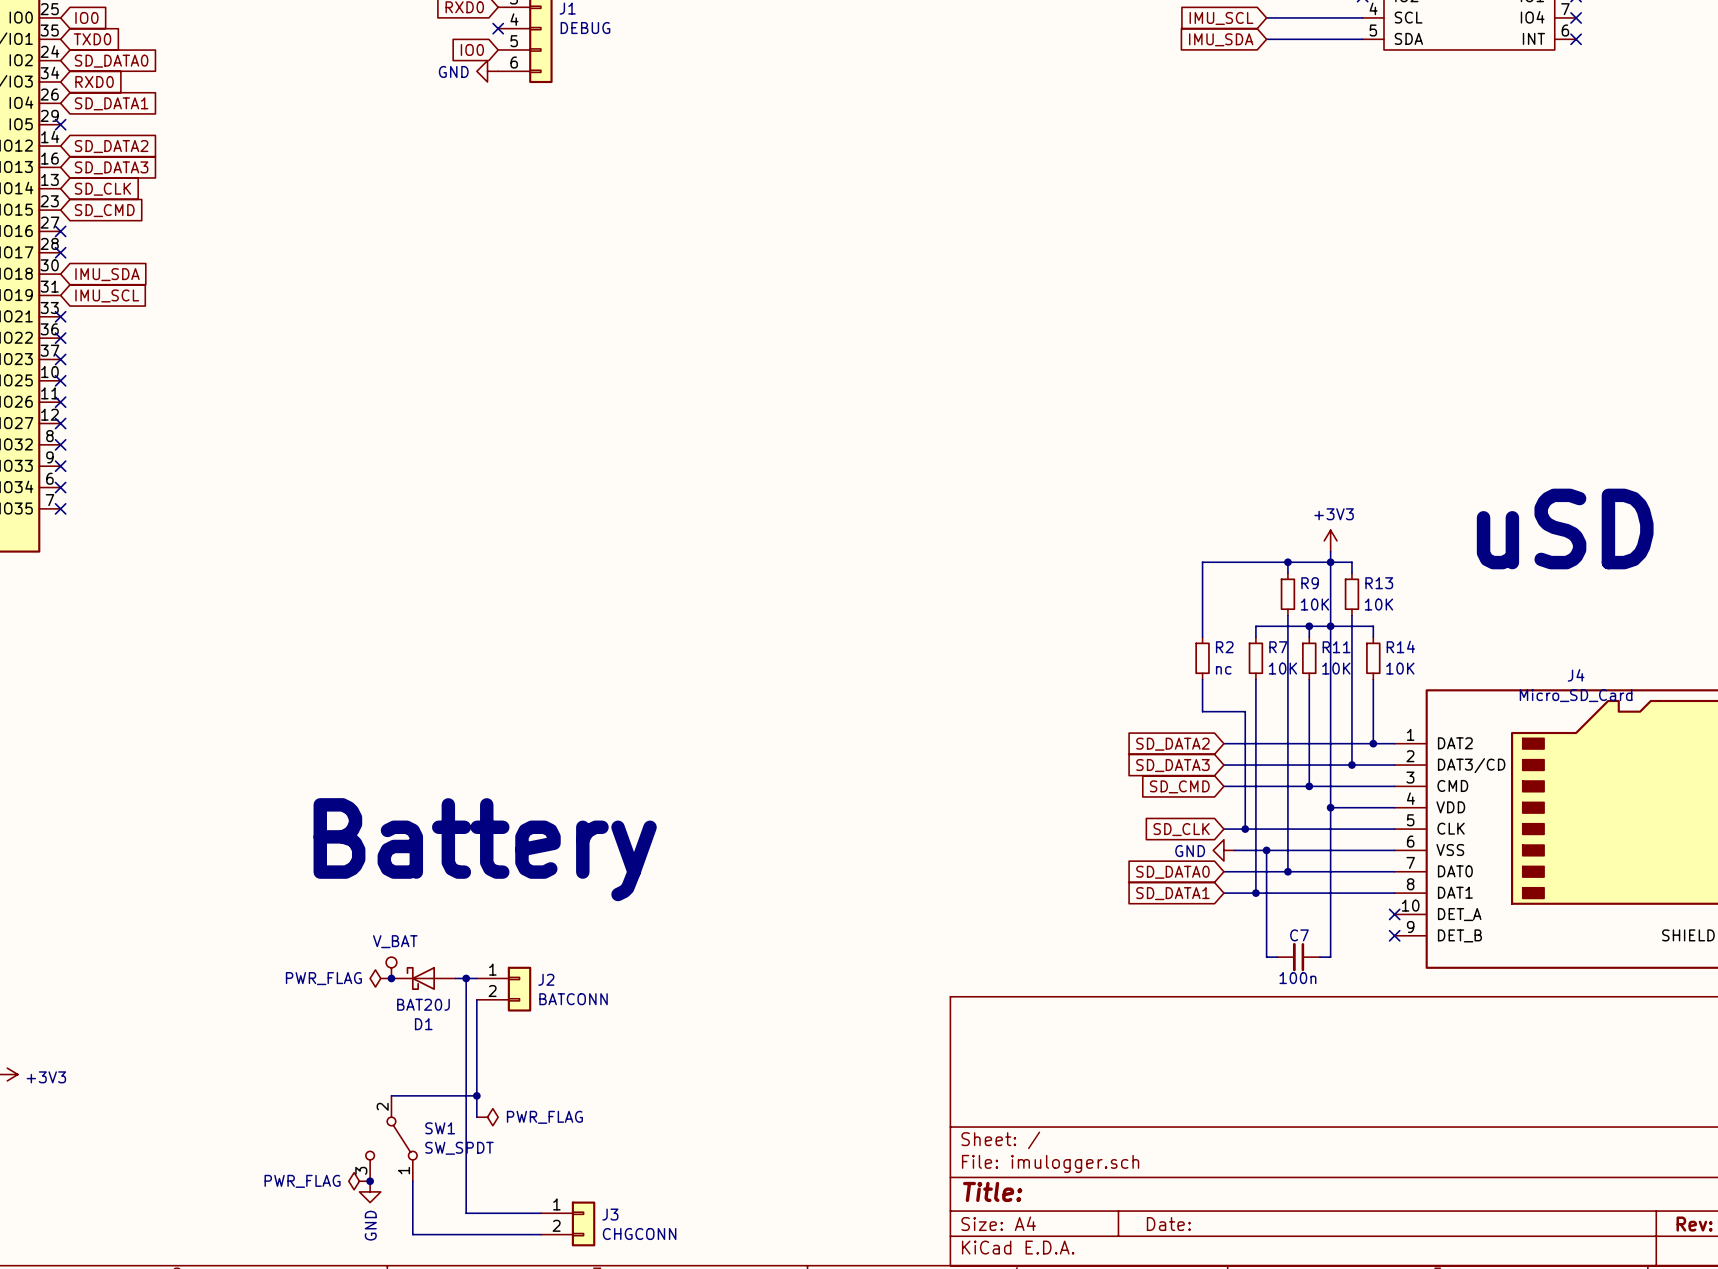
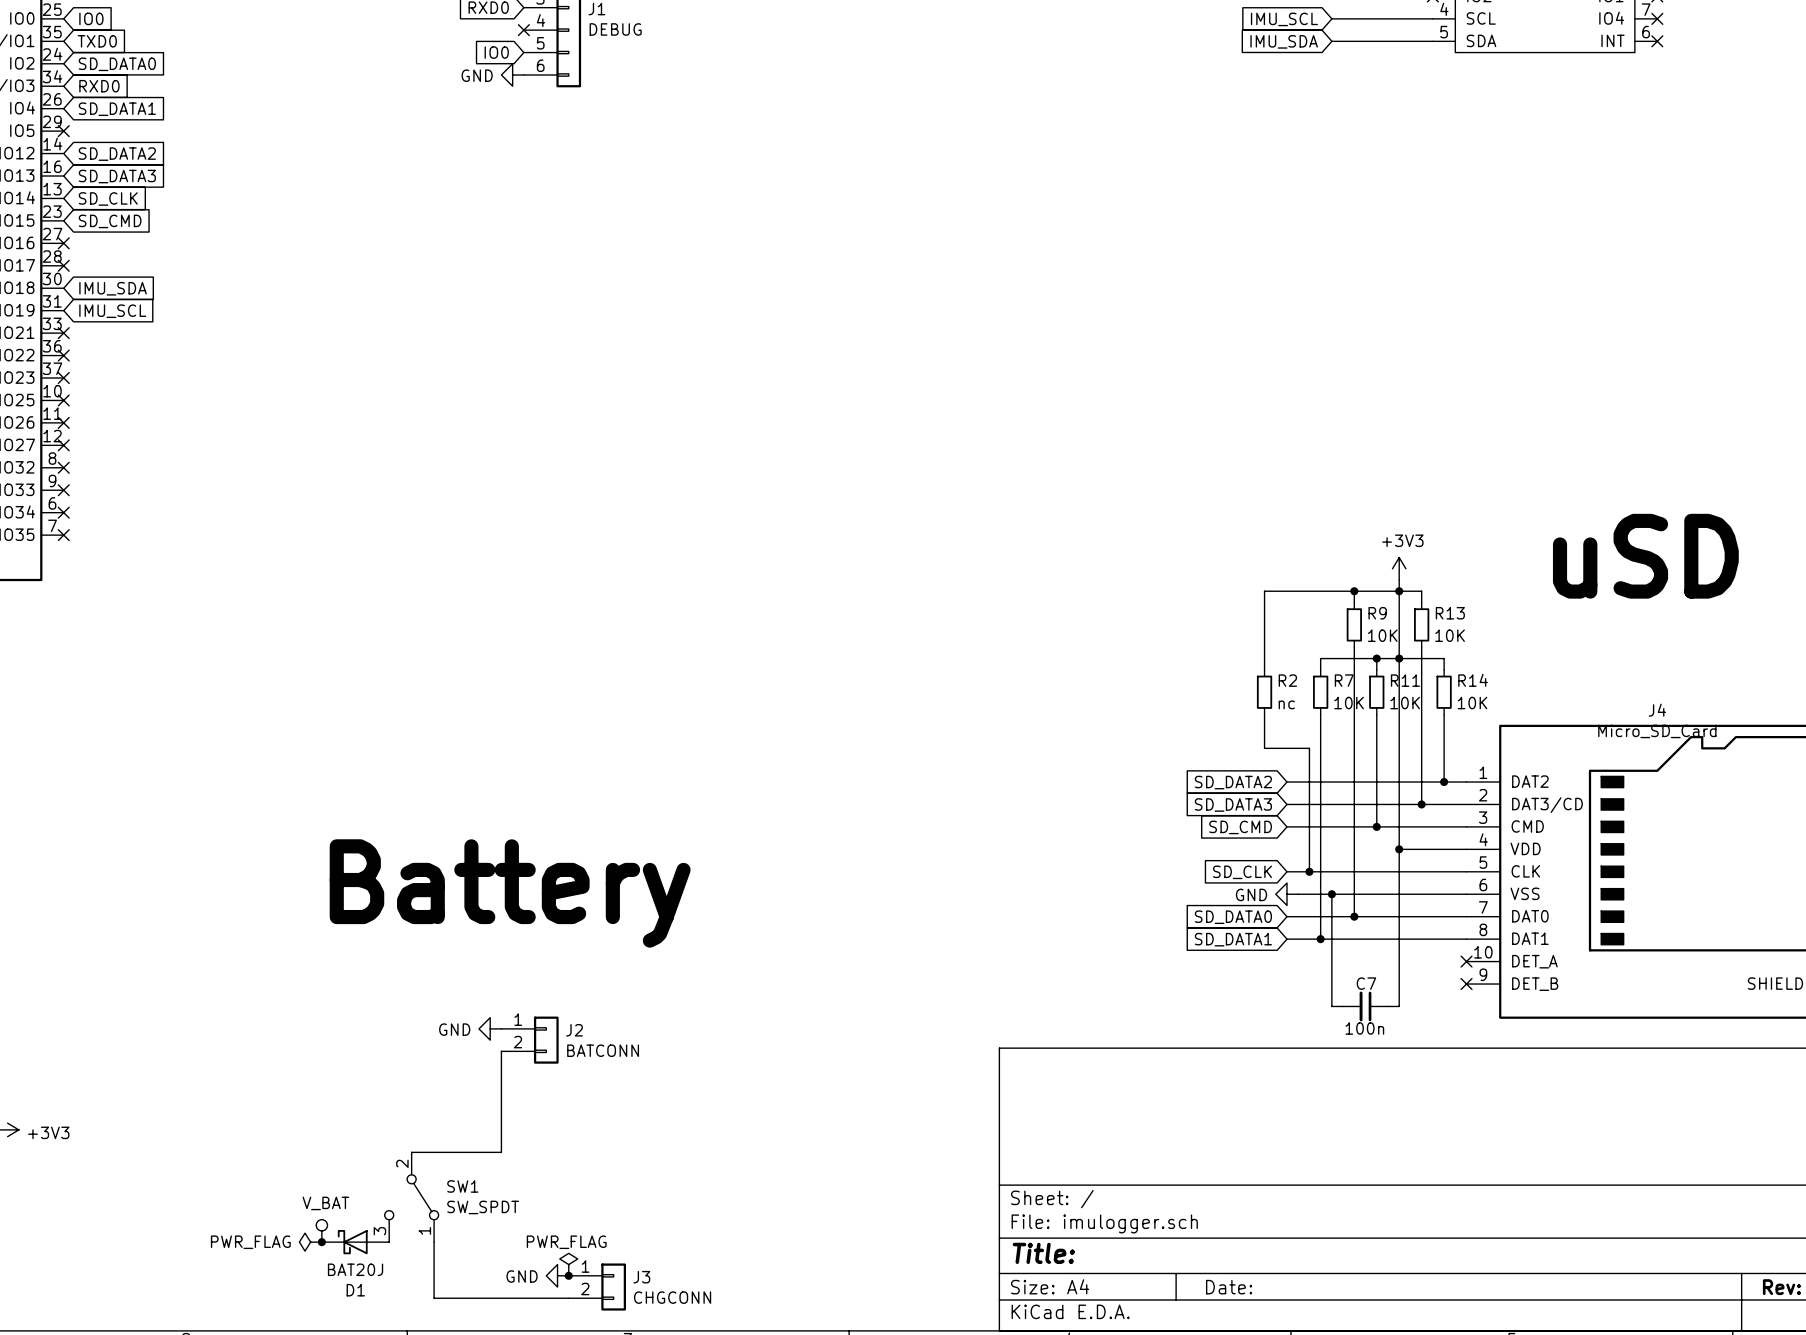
power symbol: V_BAT (391, 967) -> none
power symbol: PWR_FLAG (380, 978) -> none
junction: (391, 978) -> none
D1 position: (423, 978) -> (355, 1242)
wire: (466, 978) (466, 1213) (540, 1213) -> none
power symbol: none -> GND (490, 1028)
junction: (466, 978) -> none
wire: (476, 1095) (476, 1117) -> none
junction: (476, 1095) -> none
power symbol: PWR_FLAG (487, 1117) -> none
power symbol: none -> V_BAT (321, 1230)
junction: none -> (321, 1242)
power symbol position: PWR_FLAG (359, 1181) -> PWR_FLAG (310, 1242)
junction: (370, 1181) -> none
power symbol: GND (370, 1191) -> none
power symbol: none -> PWR_FLAG (568, 1264)
power symbol: none -> GND (557, 1275)
junction: none -> (568, 1275)

